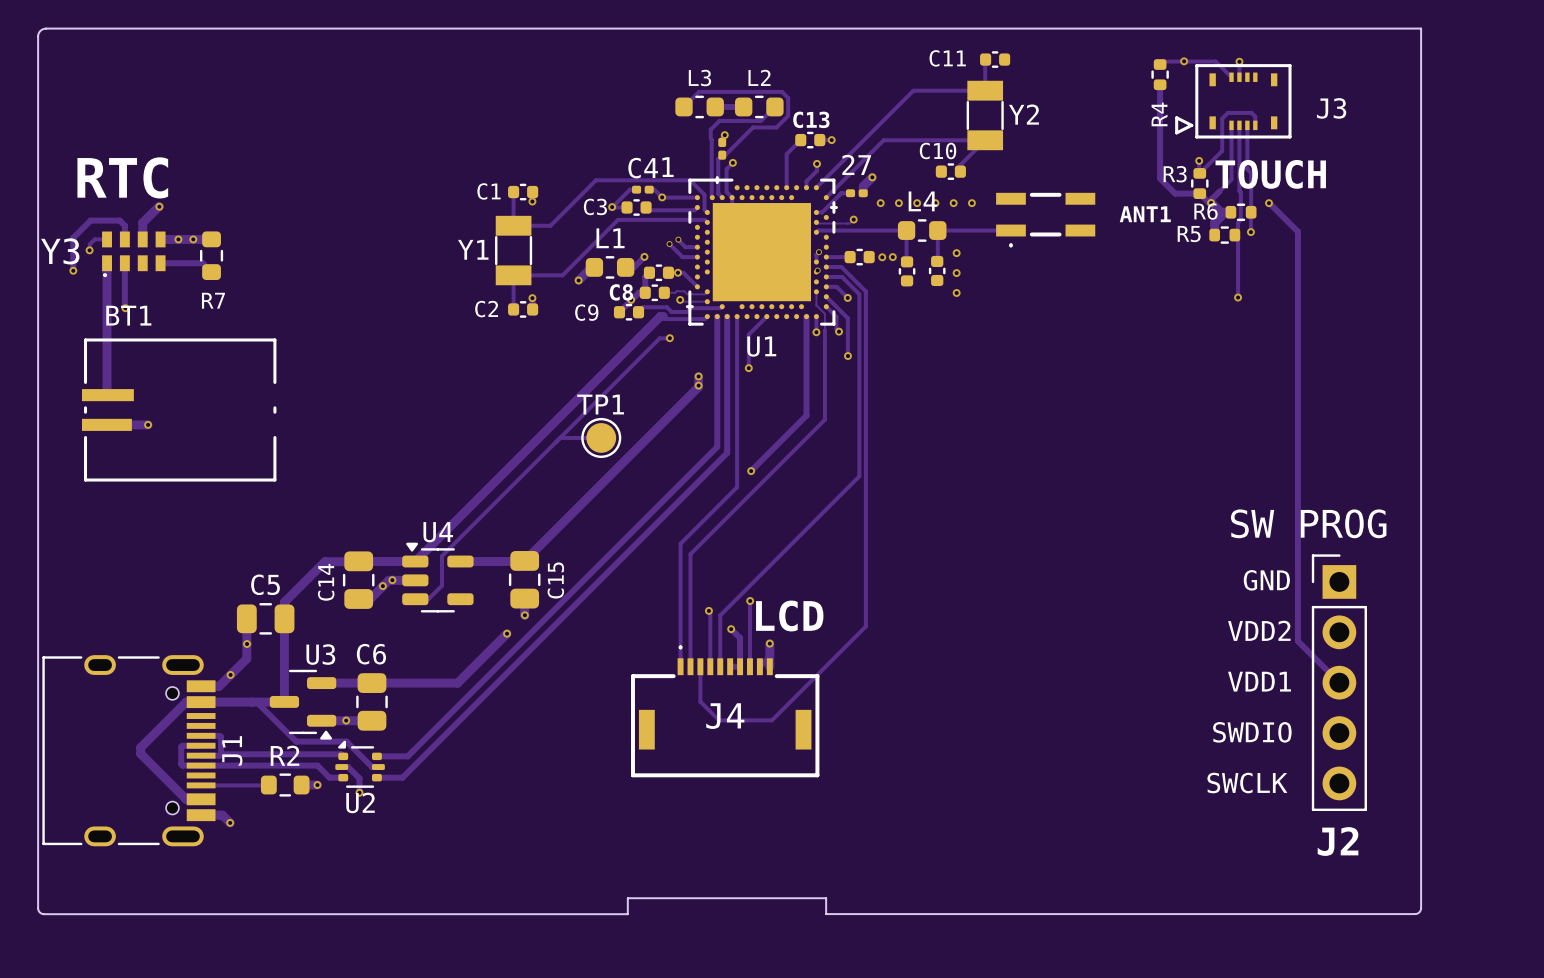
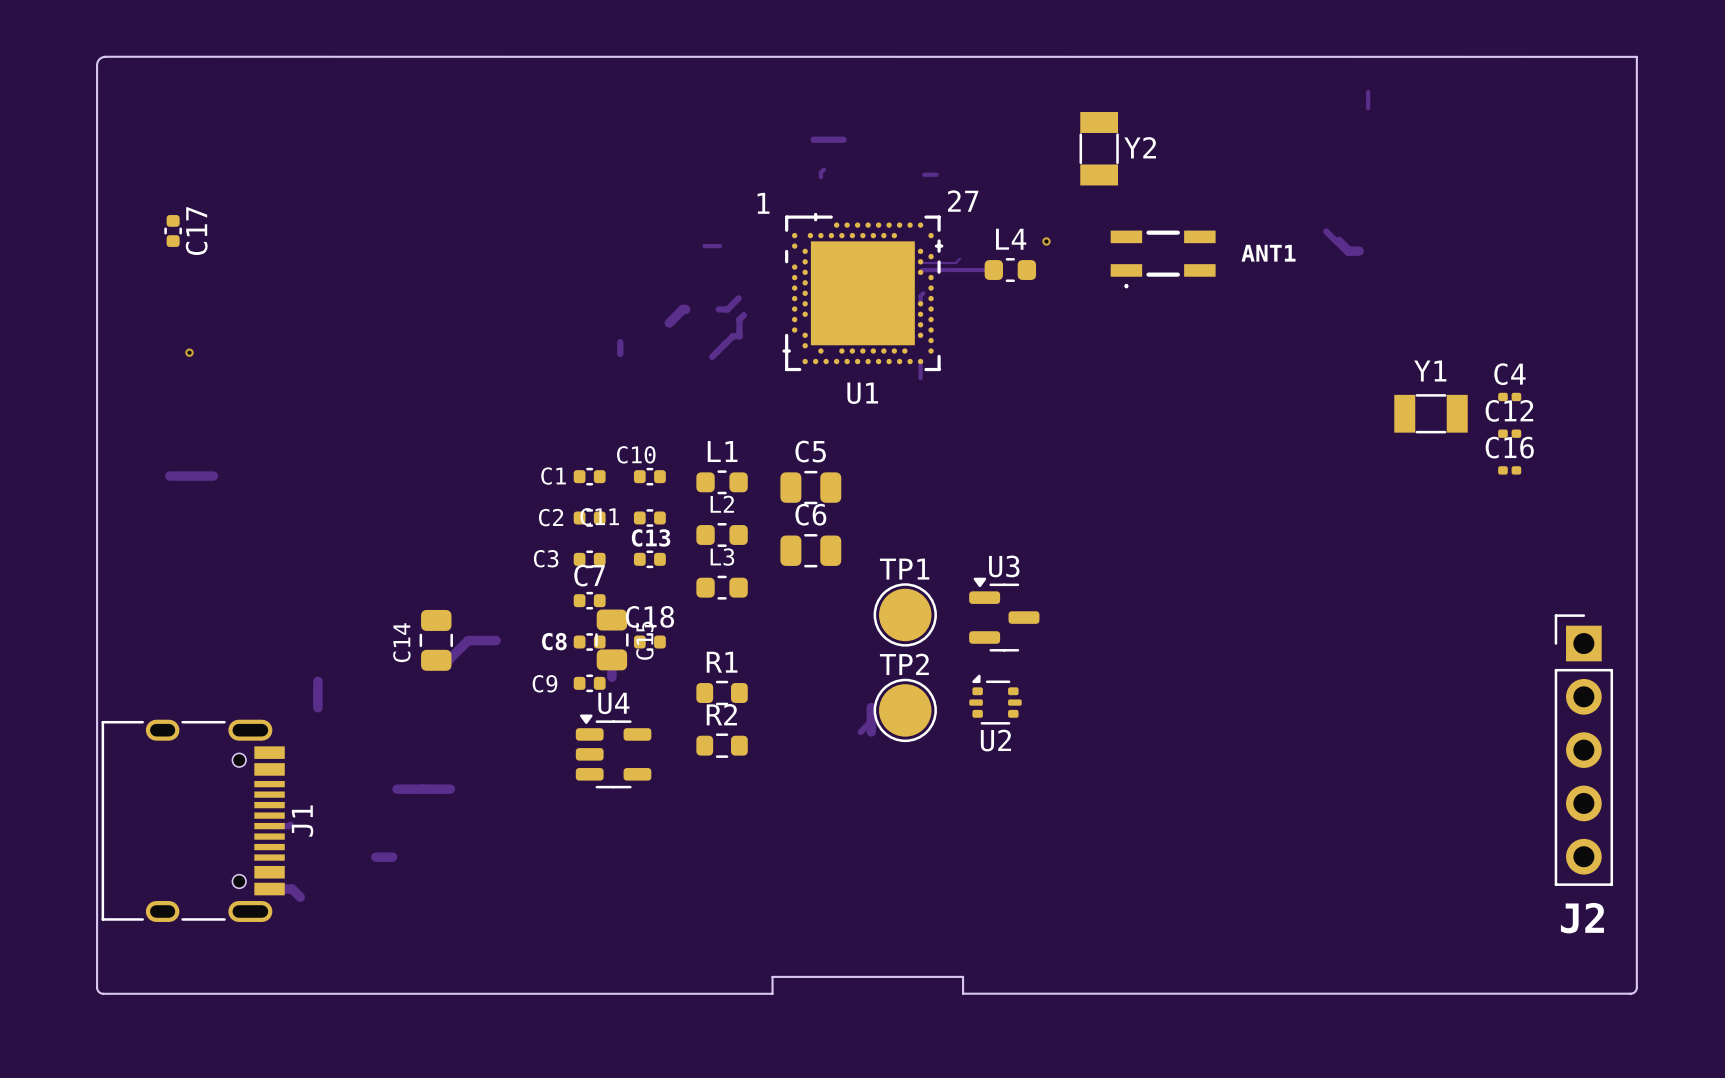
board edge: (46, 28) (1421, 28) (1421, 908) (1419, 912) (1415, 914) -> (105, 56) (1636, 56) (1636, 988) (1634, 992) (1630, 993) (1554, 993)
track: (985, 59) (985, 90) (913, 90) (816, 187) -> none
C11 position: (995, 59) -> (649, 517)
via: (1184, 61) -> none
via: (1239, 61) -> none
track: (1160, 64) (1163, 61) (1215, 61) (1231, 77) -> none
R4: (1160, 74) -> none
track: (1160, 84) (1160, 178) (1175, 193) (1199, 193) (1201, 191) -> none
J3: (1233, 101) -> none
track: (684, 106) (699, 91) (782, 91) (788, 97) (788, 115) (776, 127) (753, 127) (725, 155) (722, 155) (718, 159) (718, 193) (722, 197) -> none
L3 position: (699, 106) -> (722, 587)
L2 position: (759, 106) -> (722, 534)
track: (774, 106) (760, 120) (719, 120) (710, 129) (712, 197) -> none
track: (1231, 125) (1231, 179) (1211, 199) (1211, 203) -> none
track: (1239, 125) (1240, 220) (1238, 222) (1238, 297) -> none
track: (1247, 125) (1247, 169) (1251, 173) (1251, 212) -> none
track: (1255, 125) (1255, 116) (1251, 112) (1227, 112) (1222, 118) (1222, 150) (1199, 173) (1199, 161) -> none
via: (724, 135) -> none
track: (800, 140) (786, 154) (786, 187) -> none
C13 position: (810, 140) -> (649, 559)
via: (831, 140) -> none
part: (722, 148) -> none
via: (1199, 160) -> none
track: (732, 162) (726, 169) (726, 192) (732, 197) (732, 222) -> none
via: (732, 162) -> none
track: (817, 163) (817, 170) (806, 181) (806, 187) -> none
via: (817, 163) -> none
C10 position: (950, 171) -> (649, 476)
track: (960, 171) (960, 165) (985, 140) (883, 140) (826, 197) -> none
text: TOUCH (1270, 174) -> none
text: RTC (122, 177) -> none
track: (872, 177) (863, 186) (863, 193) -> none
via: (872, 177) -> none
R3: (1199, 183) -> none
track: (636, 189) (630, 189) (612, 207) -> none
C4 position: (642, 189) -> (1509, 396)
track: (649, 189) (654, 189) (662, 197) (697, 197) -> none
track: (513, 192) (513, 225) (550, 225) (595, 180) (690, 180) (704, 194) (704, 209) (707, 212) -> none
C1 position: (523, 192) -> (589, 476)
C17: none -> (173, 230)
track: (850, 193) (841, 193) (822, 212) (816, 212) -> none
part: (856, 193) -> none
via: (662, 197) -> none
via: (532, 201) -> none
via: (1211, 202) -> none
via: (880, 203) -> none
via: (898, 203) -> none
via: (917, 203) -> none
via: (953, 203) -> none
via: (971, 203) -> none
via: (1268, 203) -> none
track: (1269, 203) (1297, 231) (1297, 641) (1339, 682) -> none
track: (159, 206) (142, 222) (142, 239) -> none
via: (159, 206) -> none
via: (612, 207) -> none
C3 position: (636, 207) -> (589, 559)
track: (646, 207) (648, 210) (694, 210) (697, 207) -> none
track: (1225, 212) (1214, 222) (1214, 235) -> none
R6: (1241, 212) -> none
track: (1250, 212) (1250, 230) -> none
via: (853, 219) -> none
track: (707, 222) (704, 219) (618, 219) (562, 275) (513, 275) (513, 309) -> none
track: (818, 230) (906, 230) (907, 261) -> (922, 270) (993, 270)
L4 position: (922, 230) -> (1010, 270)
track: (1010, 230) (937, 230) (937, 261) -> none
via: (1250, 232) -> none
R5: (1224, 235) -> none
track: (107, 239) (94, 239) (89, 244) (89, 250) -> none
track: (124, 239) (124, 225) (119, 220) (90, 220) (73, 237) (73, 270) -> none
track: (160, 239) (211, 239) -> none
via: (178, 239) -> none
via: (193, 239) -> none
via: (678, 239) -> none
track: (678, 240) (685, 247) (697, 247) -> none
track: (669, 244) (682, 257) (697, 257) -> none
via: (669, 244) -> none
via: (89, 250) -> none
Y1 rotation: 0° (513, 250) -> 90° clockwise (1431, 413)
Y1 position: (513, 250) -> (1431, 413)
via: (819, 252) -> none
via: (956, 253) -> none
Y3: (133, 254) -> none
R7: (211, 255) -> none
via: (644, 256) -> none
track: (826, 257) (850, 257) -> none
part: (859, 257) -> none
via: (882, 257) -> none
via: (892, 257) -> none
track: (107, 263) (107, 395) -> none
track: (124, 263) (125, 308) -> none
track: (160, 263) (202, 263) (211, 272) -> none
L1 position: (610, 267) -> (722, 482)
track: (826, 267) (841, 267) (865, 291) (865, 626) (772, 720) (719, 720) (700, 701) (700, 666) -> none
via: (73, 270) -> none
via: (817, 270) -> none
part: (937, 270) -> none
part: (907, 271) -> none
part: (658, 272) -> none
track: (668, 272) (683, 272) (697, 286) -> none
via: (678, 272) -> none
via: (956, 273) -> none
track: (826, 276) (842, 276) (859, 294) (859, 476) (720, 615) (720, 666) -> none
via: (578, 280) -> none
track: (826, 286) (836, 286) (847, 297) -> none
track: (707, 291) (704, 294) (687, 294) (684, 291) (664, 292) -> none
track: (816, 291) (816, 305) (824, 313) (824, 419) (690, 554) (690, 666) -> none
C8 position: (654, 292) -> (589, 642)
via: (956, 292) -> none
track: (826, 296) (847, 318) (847, 355) -> none
via: (847, 297) -> none
via: (1238, 297) -> none
via: (532, 298) -> none
via: (631, 299) -> none
track: (680, 299) (681, 301) (707, 301) -> none
via: (680, 299) -> none
track: (722, 306) (690, 308) (687, 311) (671, 311) (666, 307) (643, 307) (638, 312) -> none
track: (826, 306) (836, 316) (836, 329) (839, 331) -> none
C2 position: (523, 309) -> (589, 517)
C9 position: (629, 312) -> (589, 683)
track: (707, 316) (704, 319) (666, 319) (660, 316) (415, 561) (358, 561) -> none
track: (717, 316) (717, 446) (407, 756) (376, 756) -> none
track: (727, 316) (727, 452) (402, 777) (376, 777) -> none
track: (737, 316) (737, 487) (680, 543) (680, 666) -> none
track: (766, 316) (748, 334) (748, 368) -> none
track: (806, 316) (806, 415) (750, 471) -> none
via: (839, 331) -> none
via: (816, 332) -> none
track: (669, 338) (659, 338) (441, 556) (441, 585) (428, 599) (415, 599) -> none
via: (669, 338) -> none
via: (847, 356) -> none
via: (748, 368) -> none
via: (698, 376) -> none
C12: none -> (1509, 433)
track: (698, 385) (698, 376) (698, 386) (524, 561) (460, 561) -> none
via: (698, 385) -> none
BT1: (179, 409) -> none
TP1 footprint: [581, 417, 622, 458] -> [873, 583, 937, 647]
C16: none -> (1509, 470)
via: (148, 424) -> none
track: (560, 437) (601, 437) -> none
via: (751, 471) -> none
text: SW PROG (1308, 523) -> none
C7: none -> (589, 600)
track: (346, 561) (324, 561) (284, 602) (284, 701) -> none
U4 position: (437, 577) -> (613, 751)
via: (392, 580) -> none
text: GND (1266, 580) -> none
C18: none -> (649, 642)
via: (382, 586) -> none
via: (750, 600) -> none
track: (749, 601) (749, 666) -> none
track: (708, 610) (710, 666) -> none
via: (708, 610) -> none
via: (524, 615) -> none
text: LCD (789, 616) -> none
C5 position: (265, 618) -> (810, 487)
R1: none -> (722, 693)
track: (731, 629) (740, 638) (740, 666) (730, 666) -> none
via: (731, 629) -> none
text: VDD2 (1259, 630) -> none
track: (507, 633) (457, 683) (321, 683) -> none
via: (507, 633) -> none
via: (769, 643) -> none
track: (246, 644) (246, 658) (219, 686) (201, 686) -> none
via: (247, 644) -> none
TP2: none -> (905, 710)
via: (230, 674) -> none
text: VDD1 (1259, 681) -> none
J2 position: (1339, 682) -> (1583, 750)
C6 rotation: 0° (371, 701) -> 90° clockwise (810, 550)
C6 position: (371, 701) -> (810, 550)
track: (252, 702) (256, 702) (296, 741) (346, 741) (371, 767) (378, 767) -> none
track: (284, 702) (186, 702) (140, 747) (140, 753) (186, 799) (201, 799) -> none
U3 rotation: 0° (303, 704) -> 180° (1004, 614)
U3 position: (303, 704) -> (1004, 614)
J4: (725, 711) -> none
via: (346, 720) -> none
text: SWDIO (1252, 732) -> none
track: (201, 735) (219, 735) (221, 754) (341, 754) (343, 756) -> none
track: (201, 745) (182, 745) (181, 764) (317, 765) (329, 777) (343, 777) -> none
U2 position: (360, 764) -> (995, 699)
track: (341, 767) (348, 767) (359, 778) (359, 792) -> none
text: SWCLK (1247, 783) -> none
track: (268, 785) (201, 785) -> none
R2 position: (285, 785) -> (722, 745)
via: (317, 785) -> none
via: (359, 792) -> none
via: (230, 822) -> none
board edge: (676, 898) (627, 898) (627, 914) -> (772, 976) (772, 993) (721, 993)
board edge: (826, 898) (826, 914) (856, 914) -> (930, 976) (963, 976) (963, 993)

